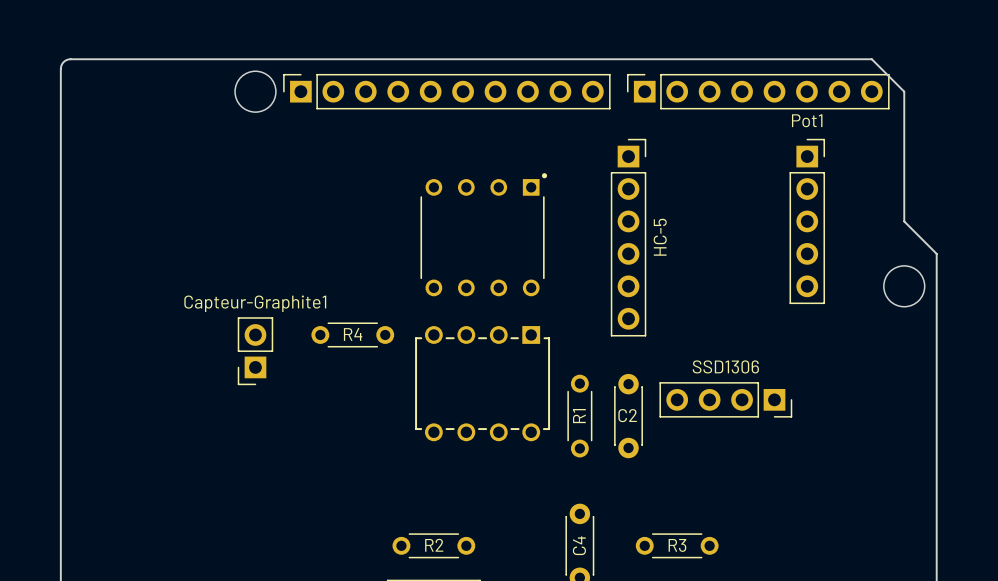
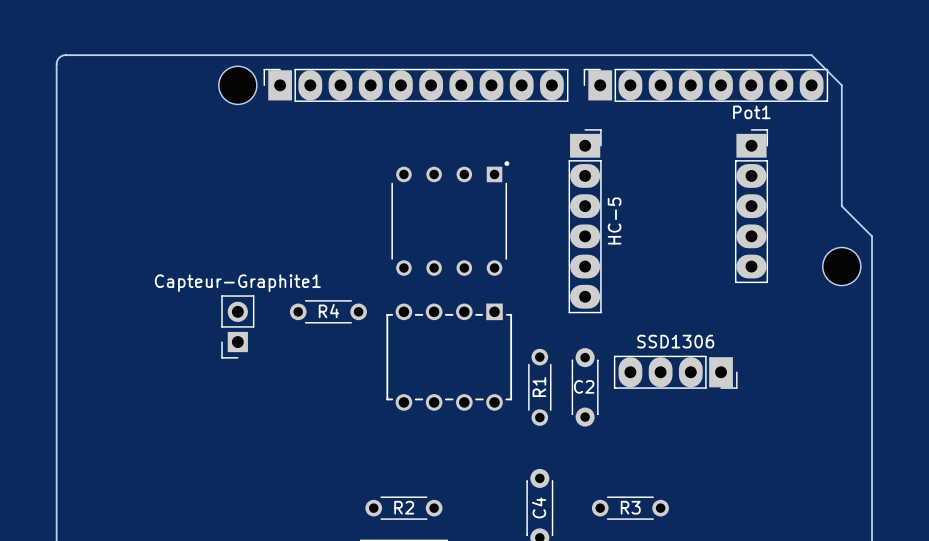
part footprint: [283, 73, 611, 110] -> [263, 68, 569, 102]
part footprint: [627, 73, 890, 110] -> [583, 68, 829, 102]
HC-5 footprint: [610, 138, 647, 337] -> [568, 129, 602, 314]
Pot1 footprint: [789, 138, 826, 305] -> [734, 129, 769, 284]
SSD1306 footprint: [659, 382, 793, 418] -> [613, 355, 738, 389]

